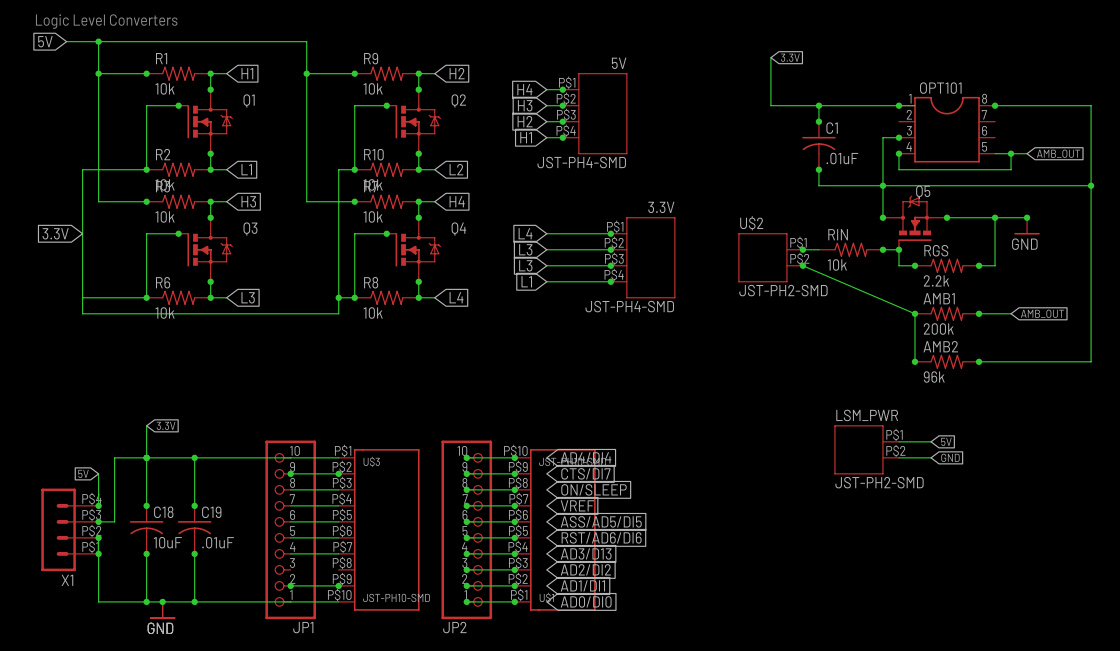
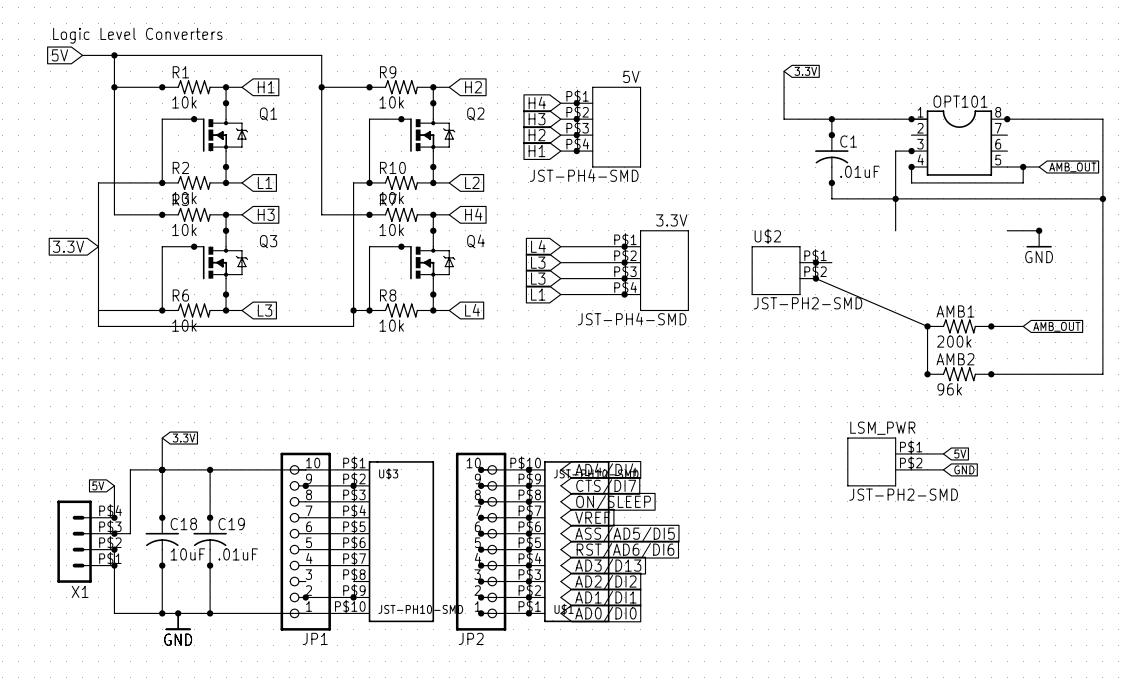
junction: (882, 217) -> none
wire: (947, 217) (995, 217) (995, 265) (979, 265) -> none
junction: (947, 217) -> none
junction: (995, 217) -> none
Q5: (914, 222) -> none
RIN: 10k (850, 249) -> none
wire: (882, 249) (898, 249) (898, 265) (914, 265) -> none
junction: (882, 249) -> none
junction: (898, 249) -> none
junction: (914, 265) -> none
RGS: 2.2k (947, 265) -> none
junction: (979, 265) -> none

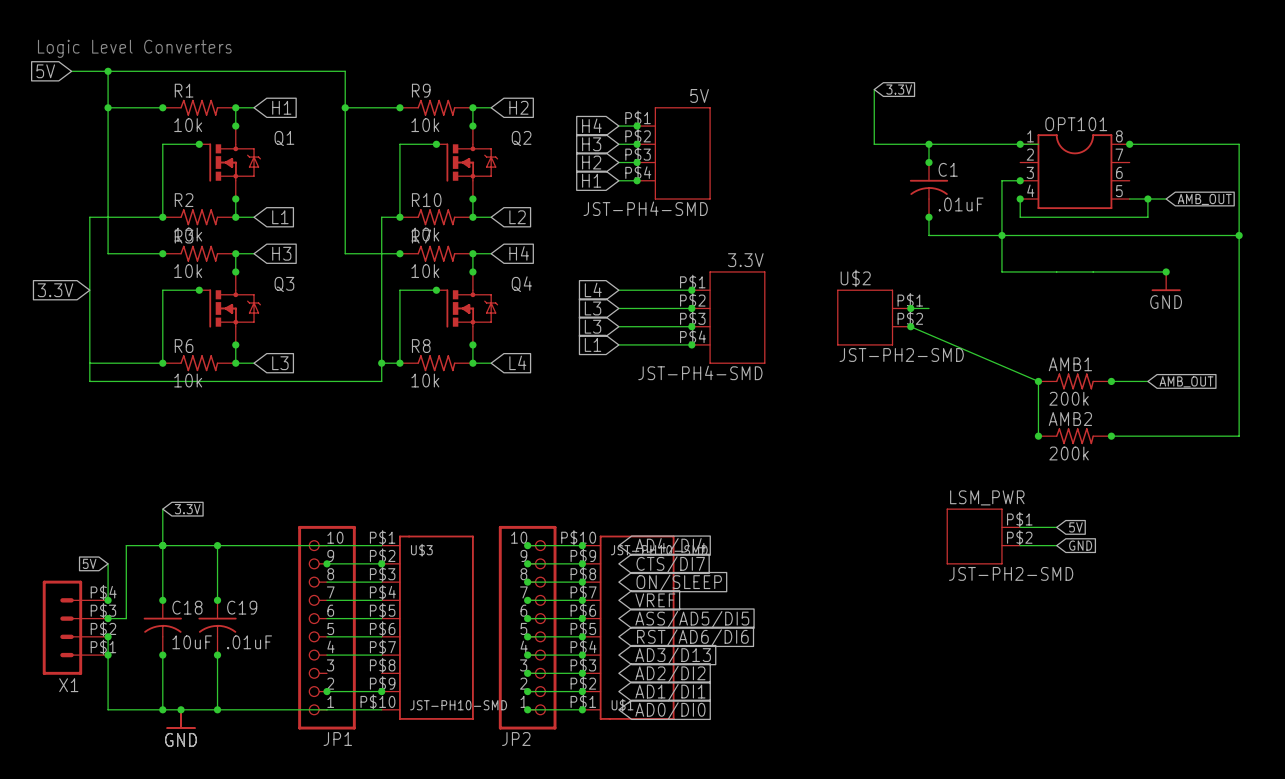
wire: none -> (1001, 271) (1129, 271)
AMB2 value: 96k (949, 389) -> 200k (1069, 453)

